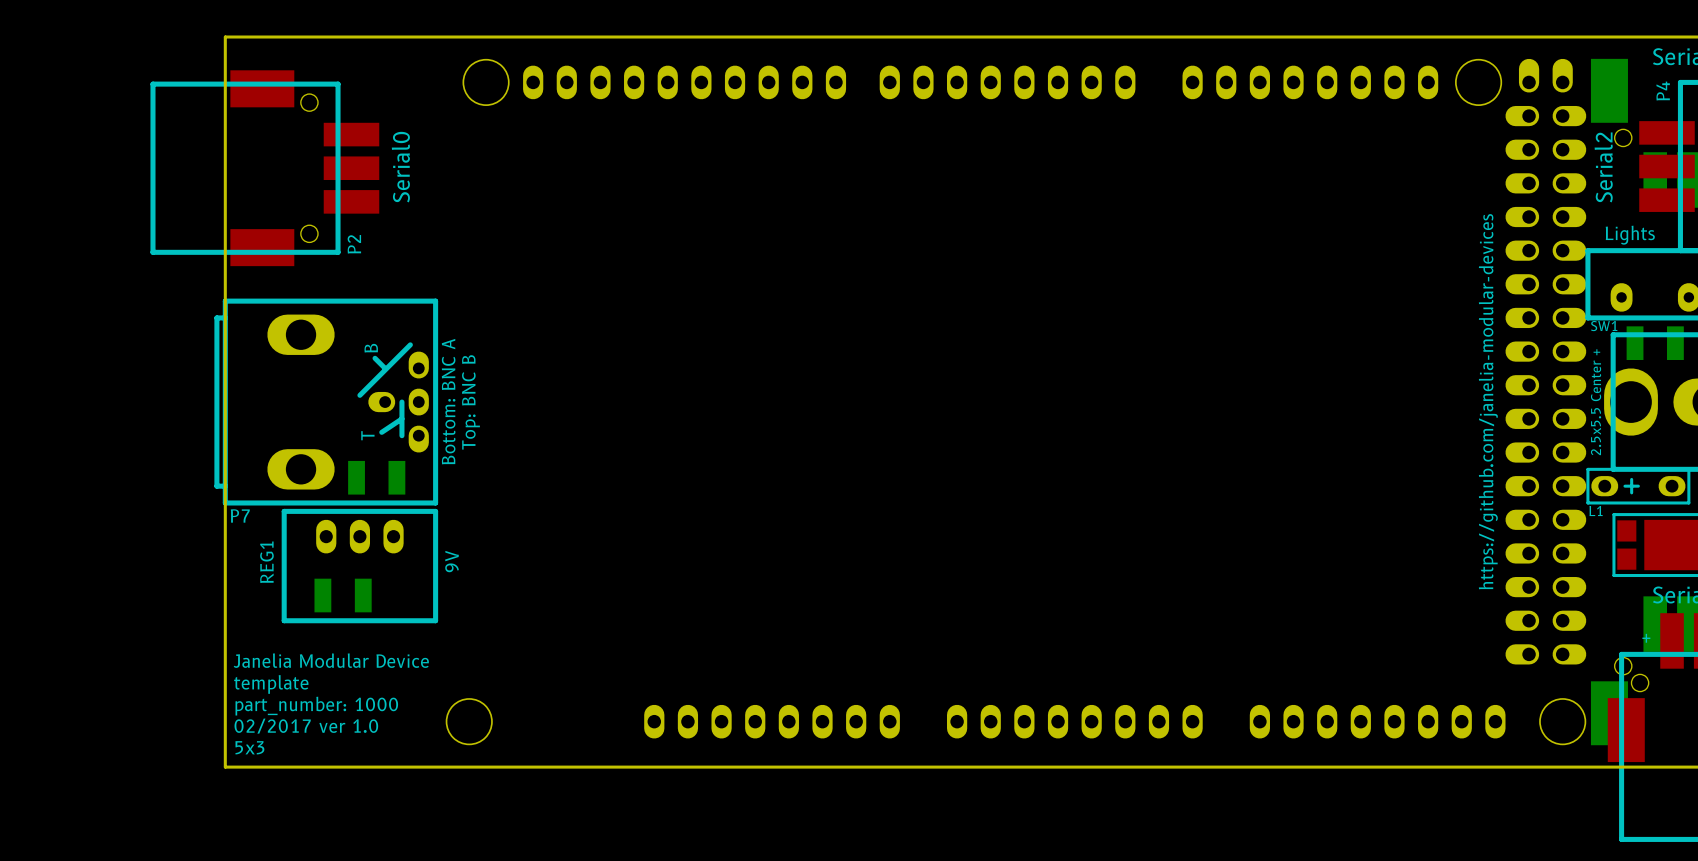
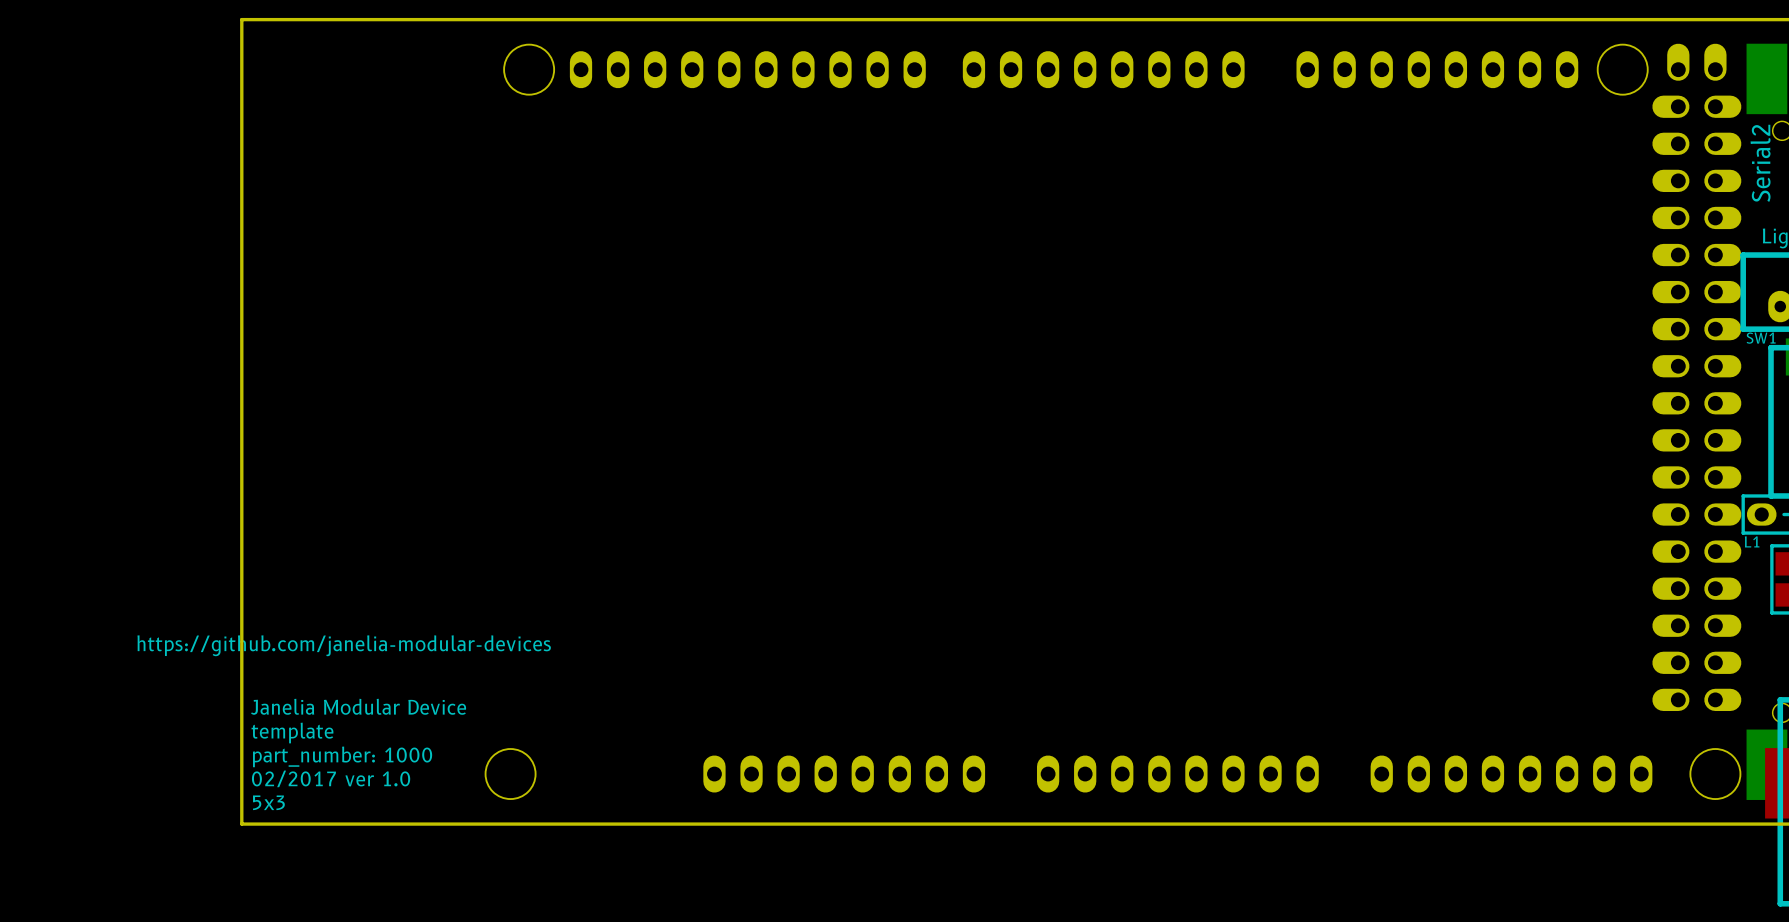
text: Serial0 (400, 167) -> none
P2: (264, 168) -> none
text: https://github.com/janelia-modular-devices (1488, 401) -> none
P7: (326, 402) -> none
text: 2.5x5.5 Center + (1596, 402) -> none
part: (376, 477) -> none
text: 9V (452, 561) -> none
REG1: (359, 566) -> none
part: (343, 595) -> none
text: none -> https://github.com/janelia-modular-devices (344, 645)

